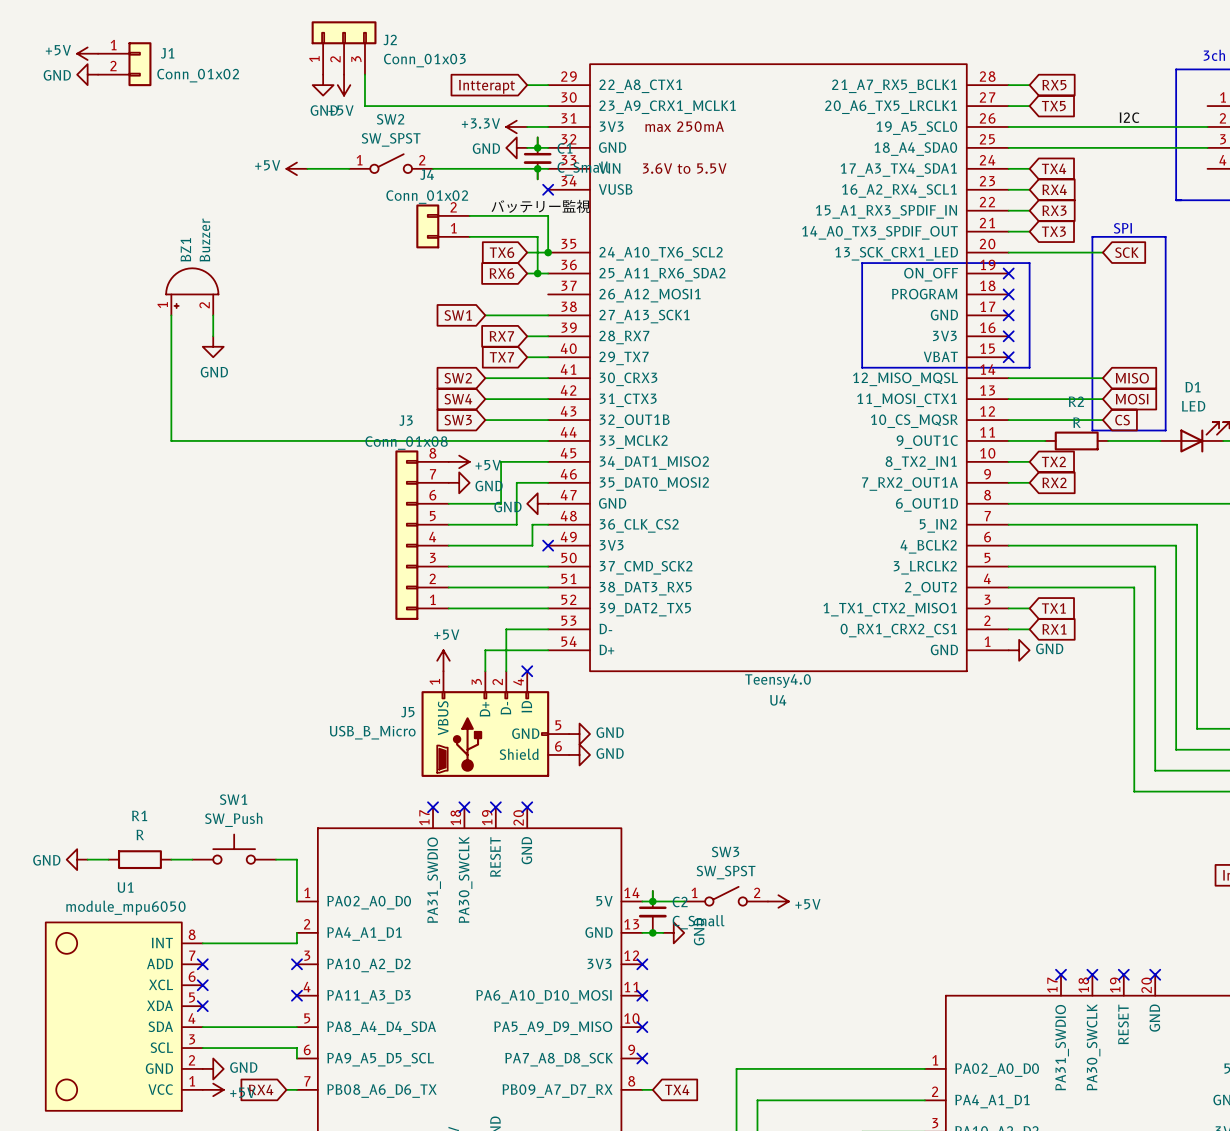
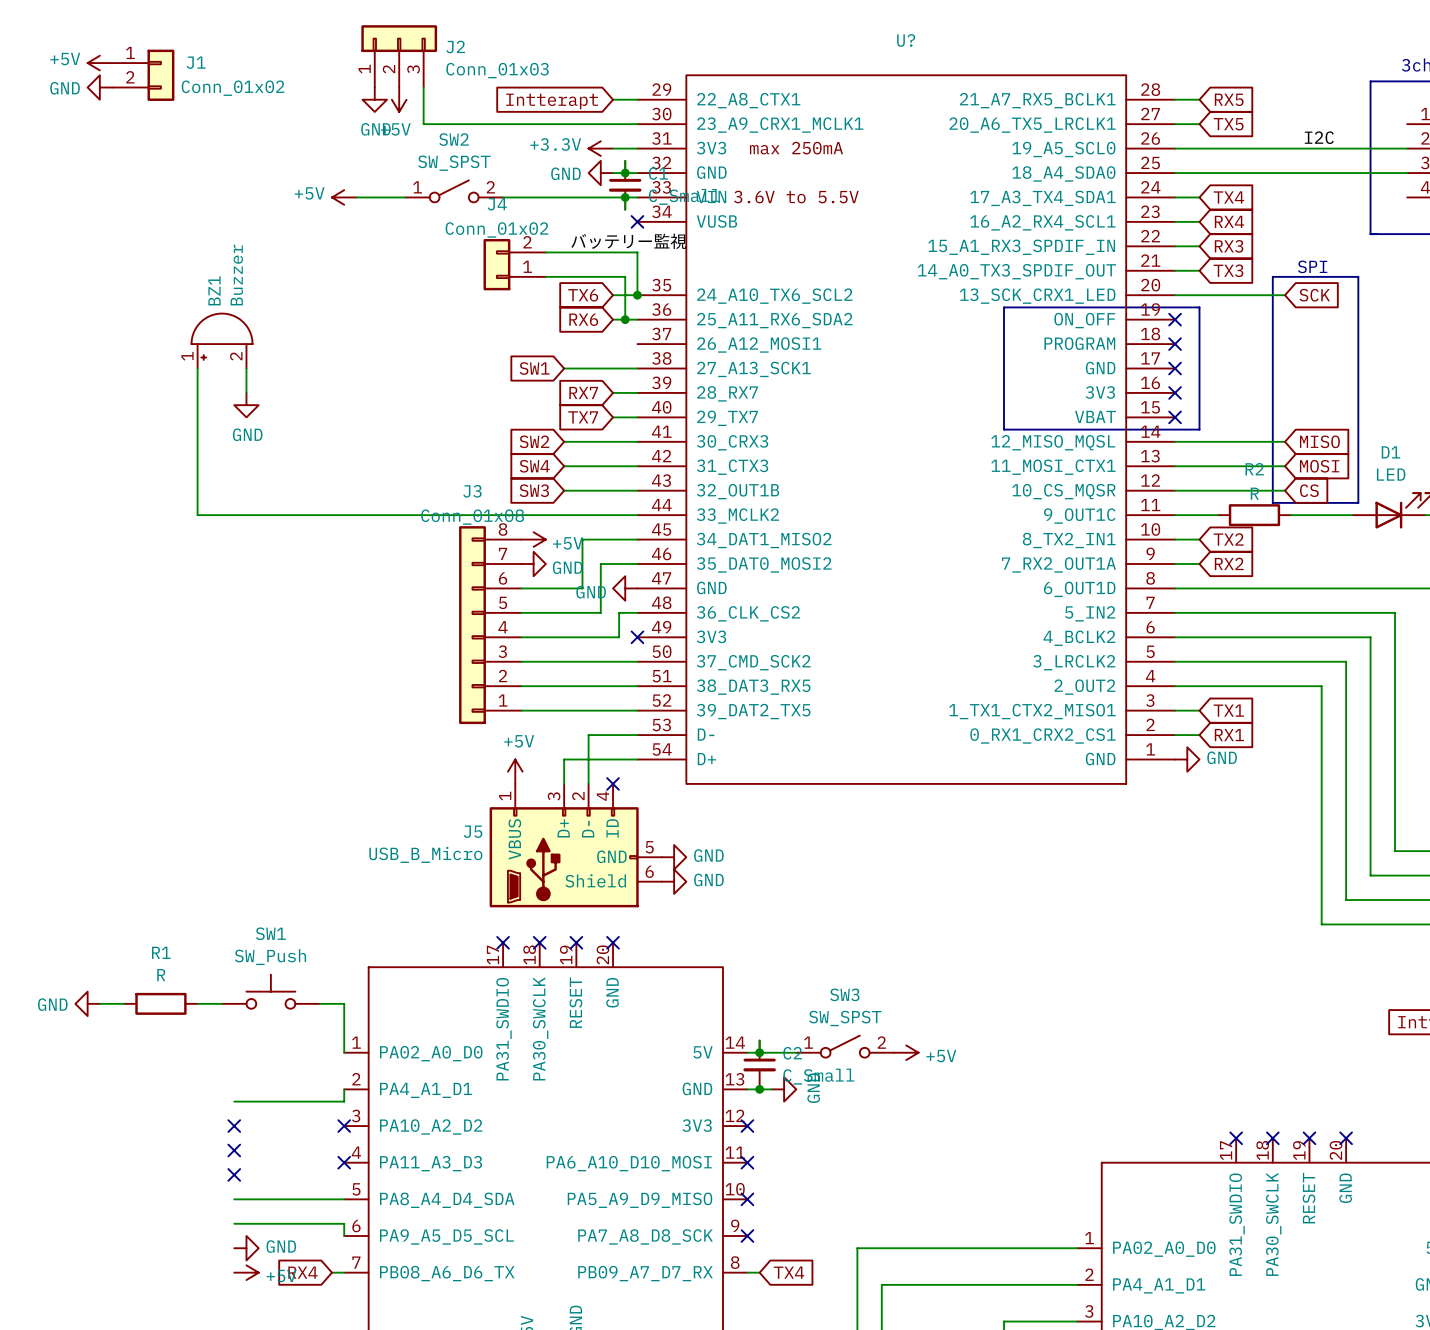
U4 value: Teensy4.0 (778, 681) -> none
U4 name: U4 (778, 700) -> U? (906, 40)
U1: module_mpu6050 (124, 1016) -> none

